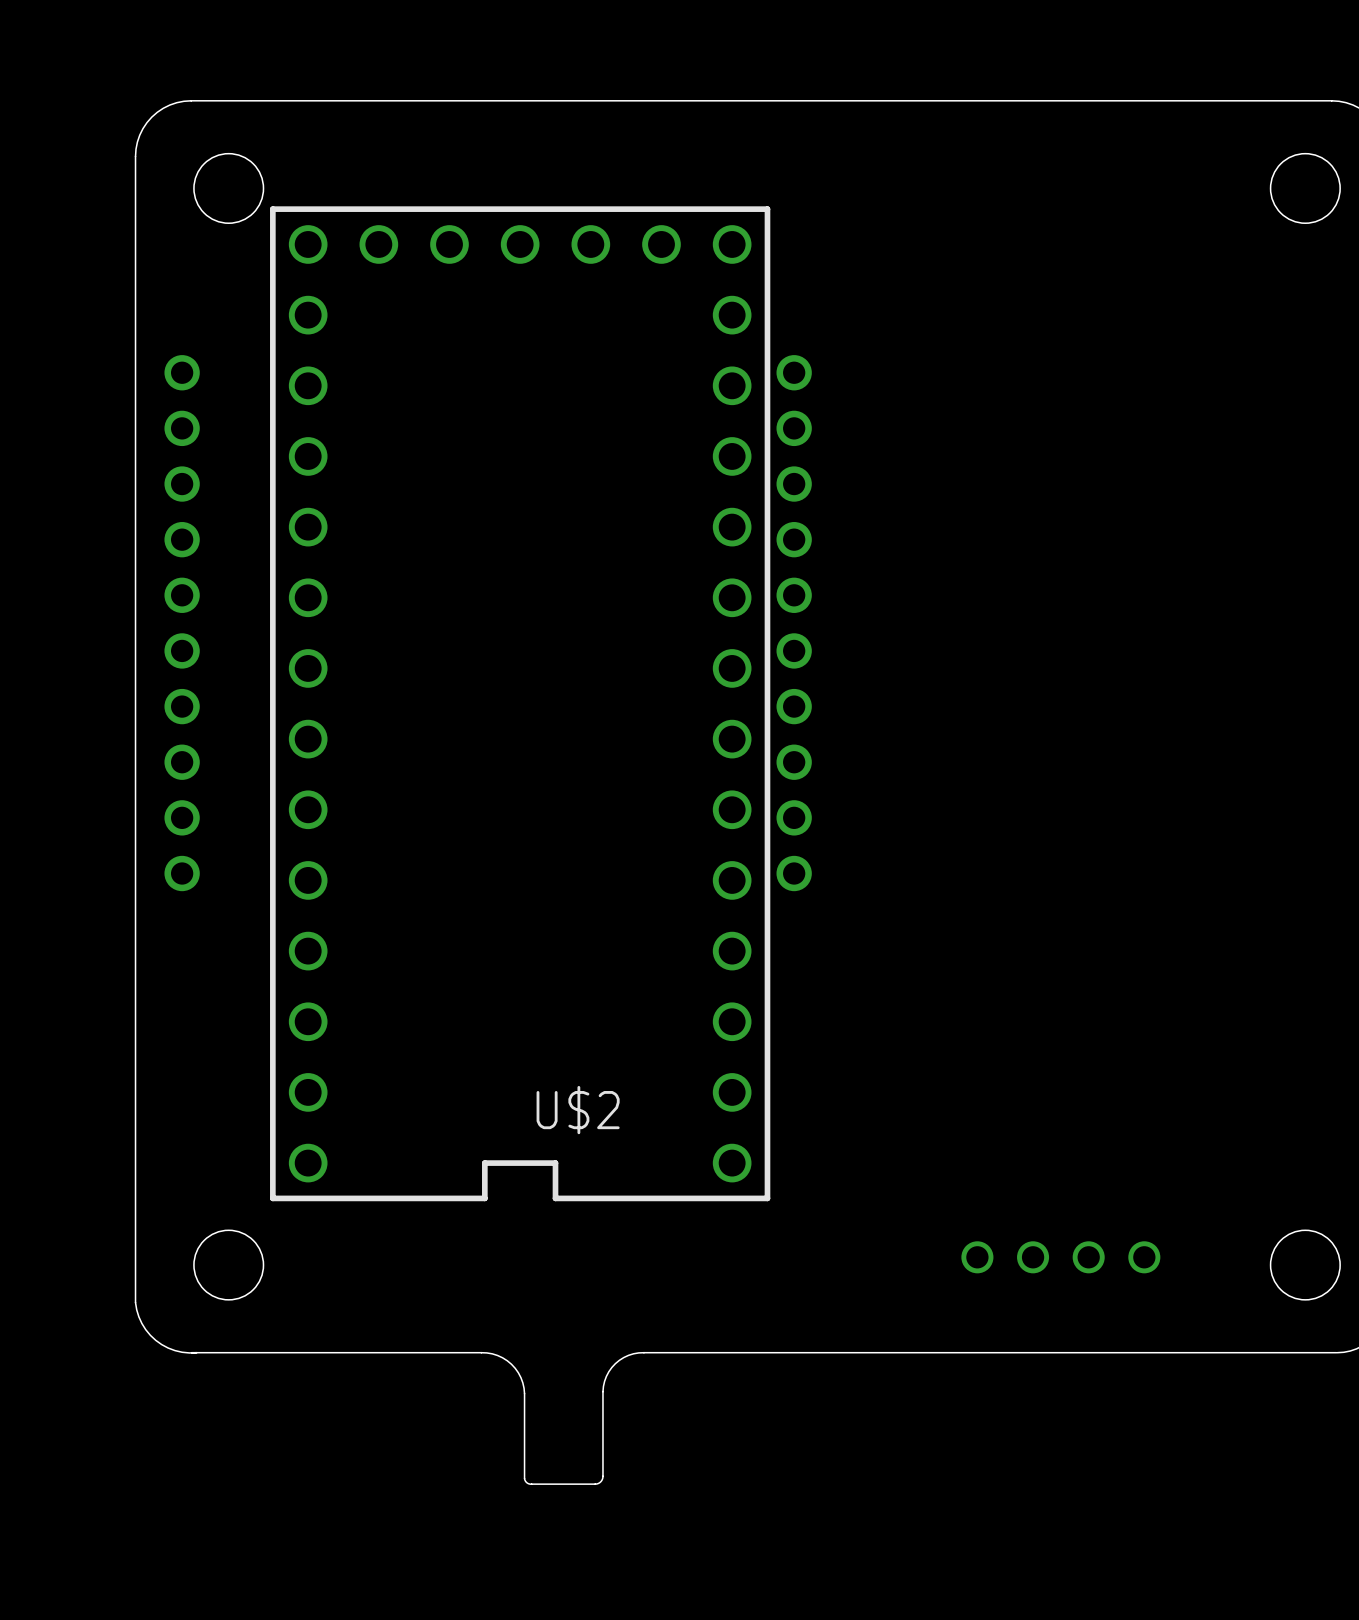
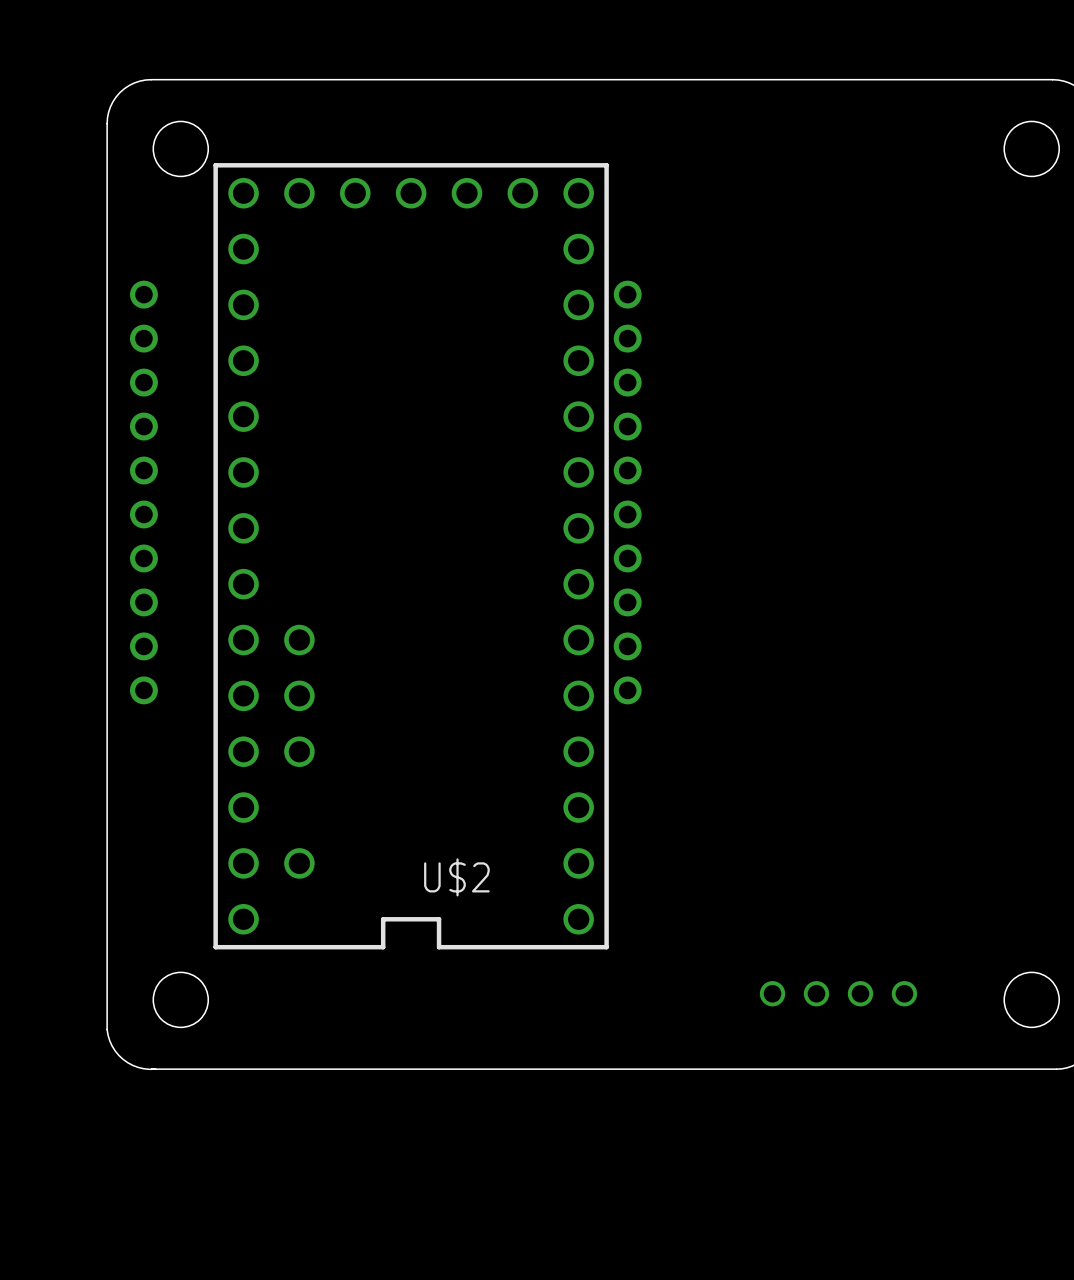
U$2 footprint: [270, 206, 771, 1202] -> [213, 163, 609, 950]
board edge: (643, 1352) (633, 1353) (619, 1360) (608, 1371) (604, 1381) (601, 1481) (595, 1484) (530, 1484) (526, 1482) (524, 1478) (524, 1393) (520, 1377) (511, 1364) (502, 1357) (481, 1352) -> (508, 1069) (380, 1069)

